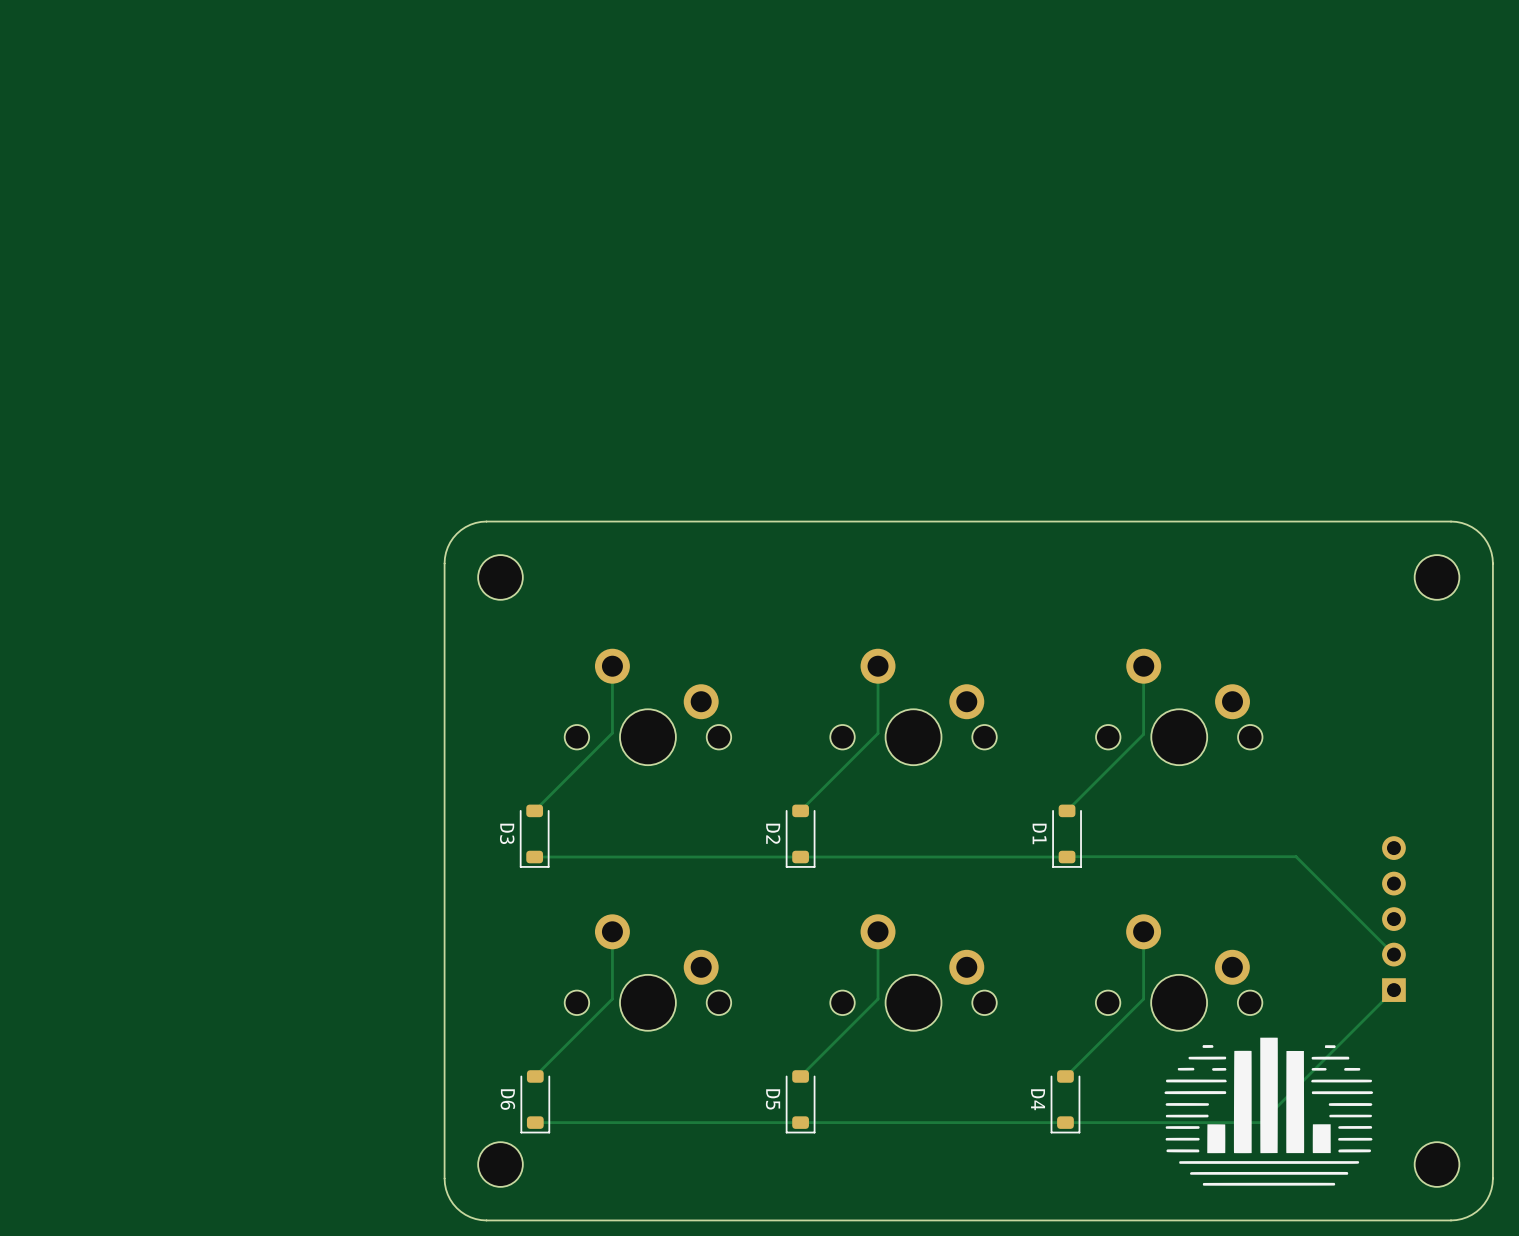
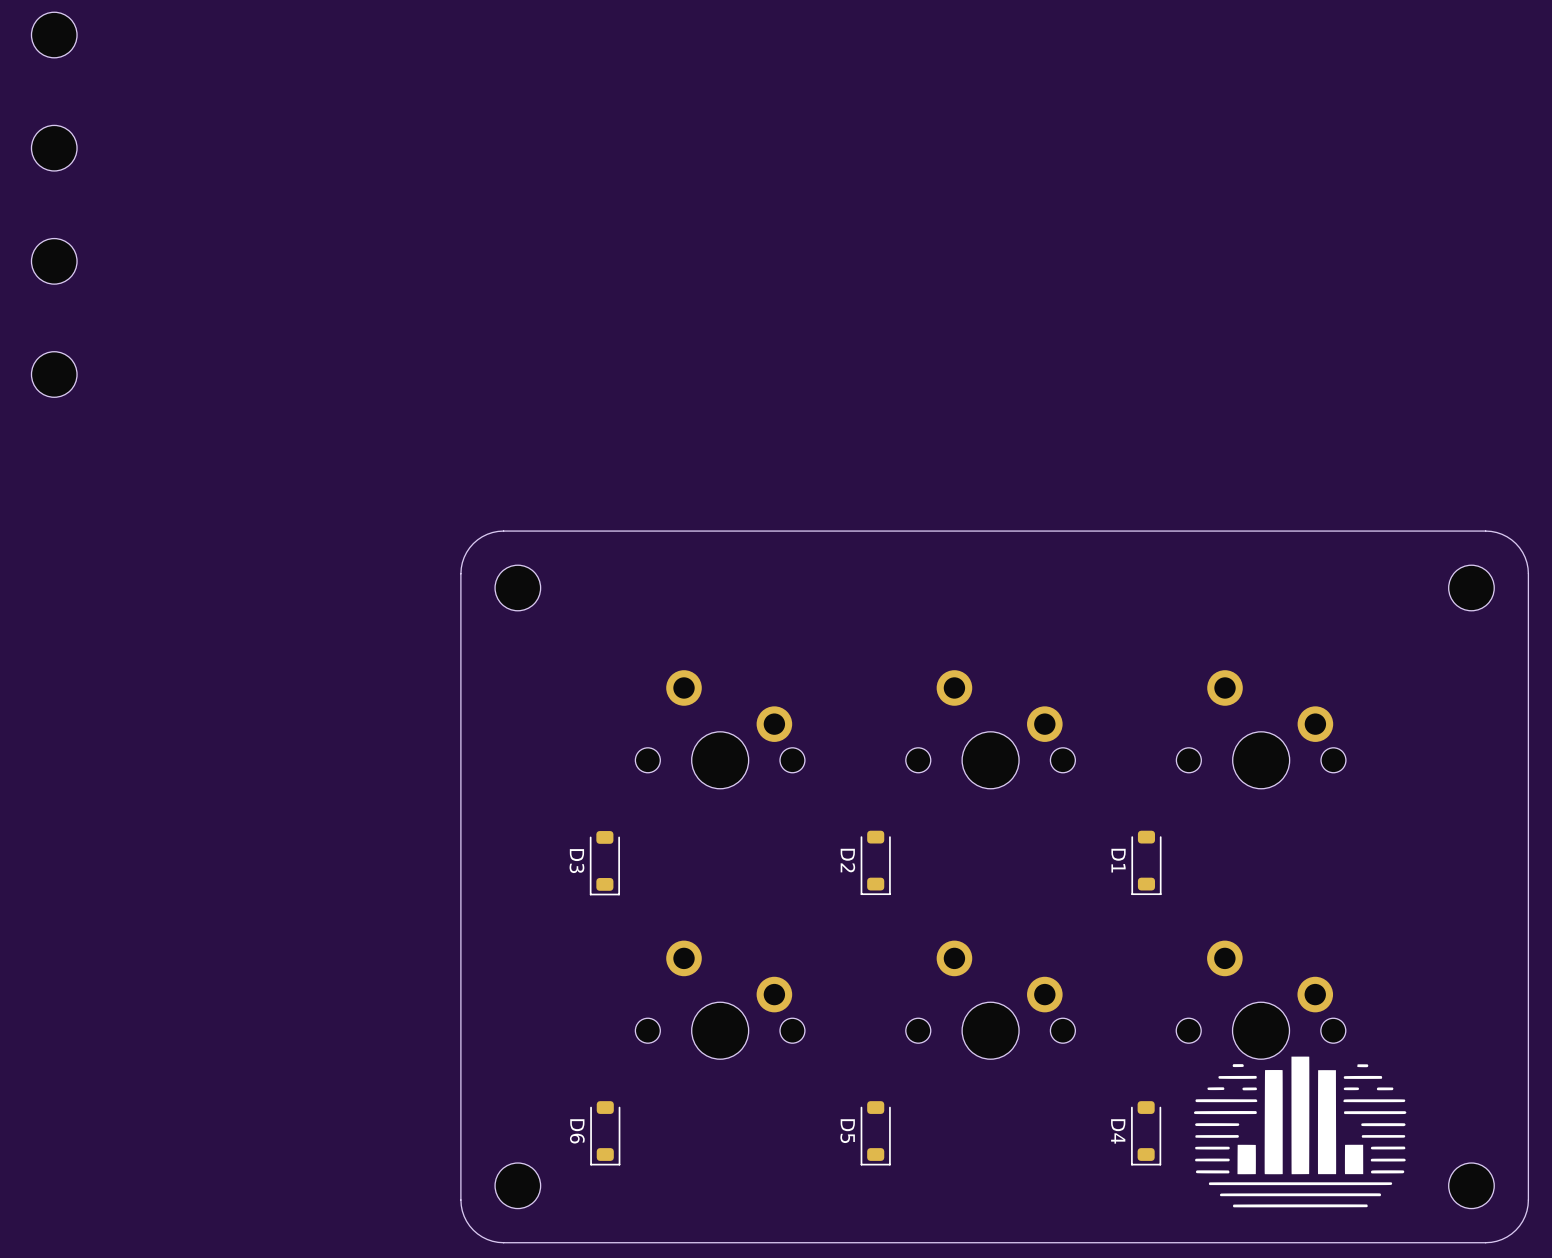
part: none -> (54, 35)
part: none -> (54, 148)
part: none -> (54, 261)
part: none -> (54, 374)
track: (612, 666) (612, 733) (534, 810) -> none
track: (878, 666) (878, 733) (800, 810) -> none
track: (1143, 666) (1143, 734) (1067, 810) -> none
part position: (647, 706) -> (720, 729)
part position: (913, 706) -> (990, 729)
part position: (1179, 706) -> (1261, 729)
D3 position: (534, 836) -> (604, 863)
D2 position: (800, 836) -> (875, 862)
D1 position: (1067, 836) -> (1146, 862)
track: (1066, 857) (1296, 856) (1393, 954) -> none
track: (1067, 857) (534, 857) -> none
part: (1393, 919) -> none
track: (612, 931) (612, 999) (535, 1076) -> none
track: (878, 931) (878, 999) (800, 1076) -> none
track: (1143, 931) (1143, 999) (1065, 1077) -> none
part position: (647, 972) -> (720, 999)
part position: (913, 972) -> (990, 999)
part position: (1179, 972) -> (1261, 999)
track: (1393, 990) (1261, 1122) (535, 1122) -> none
D6 position: (535, 1101) -> (605, 1133)
D5 position: (800, 1101) -> (875, 1133)
D4 position: (1065, 1101) -> (1146, 1133)

